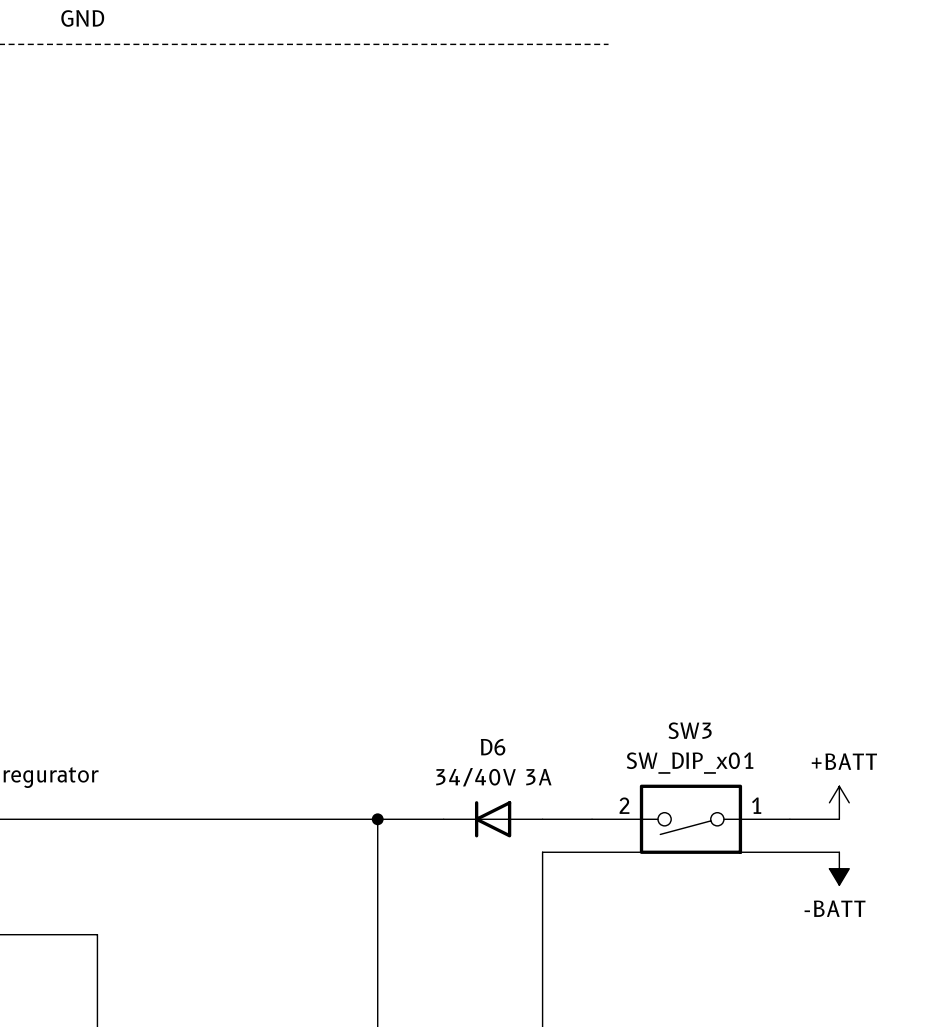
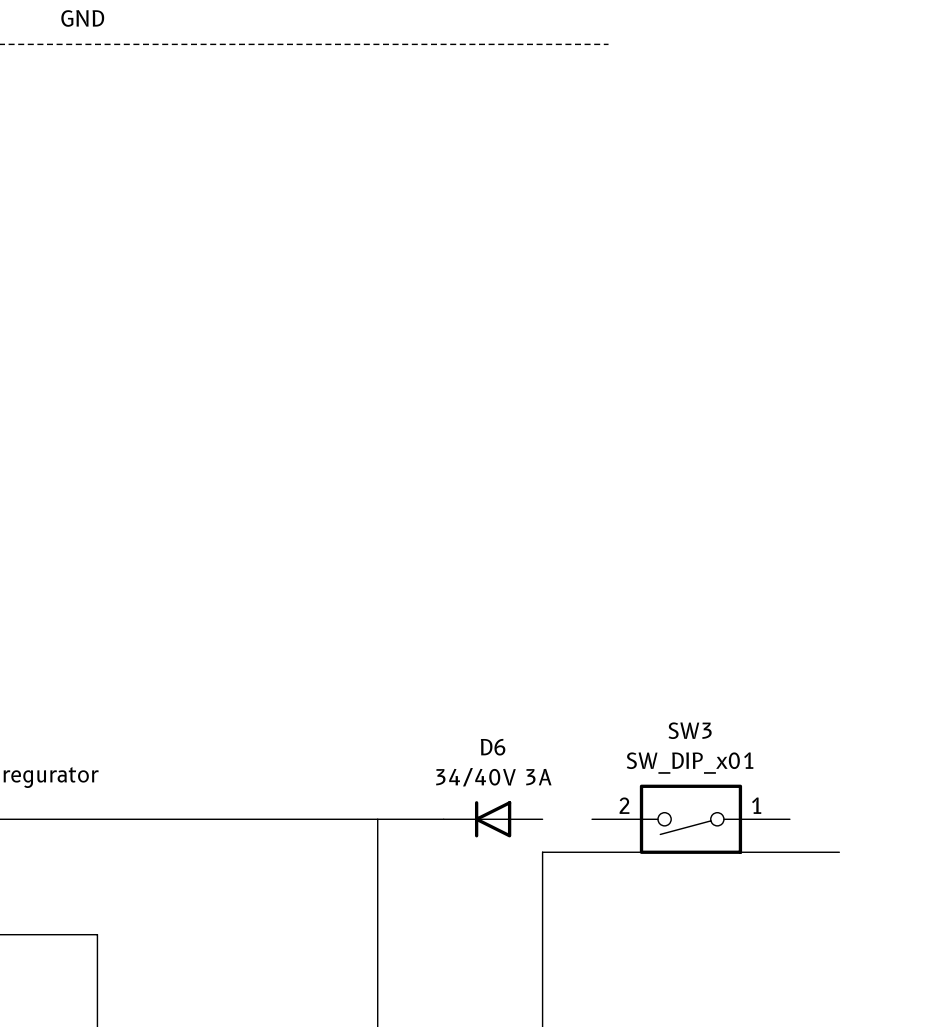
power symbol: +BATT (839, 802) -> none
junction: (377, 819) -> none
wire: (542, 819) (592, 819) -> none
wire: (789, 819) (839, 819) -> none
power symbol: -BATT (839, 868) -> none

